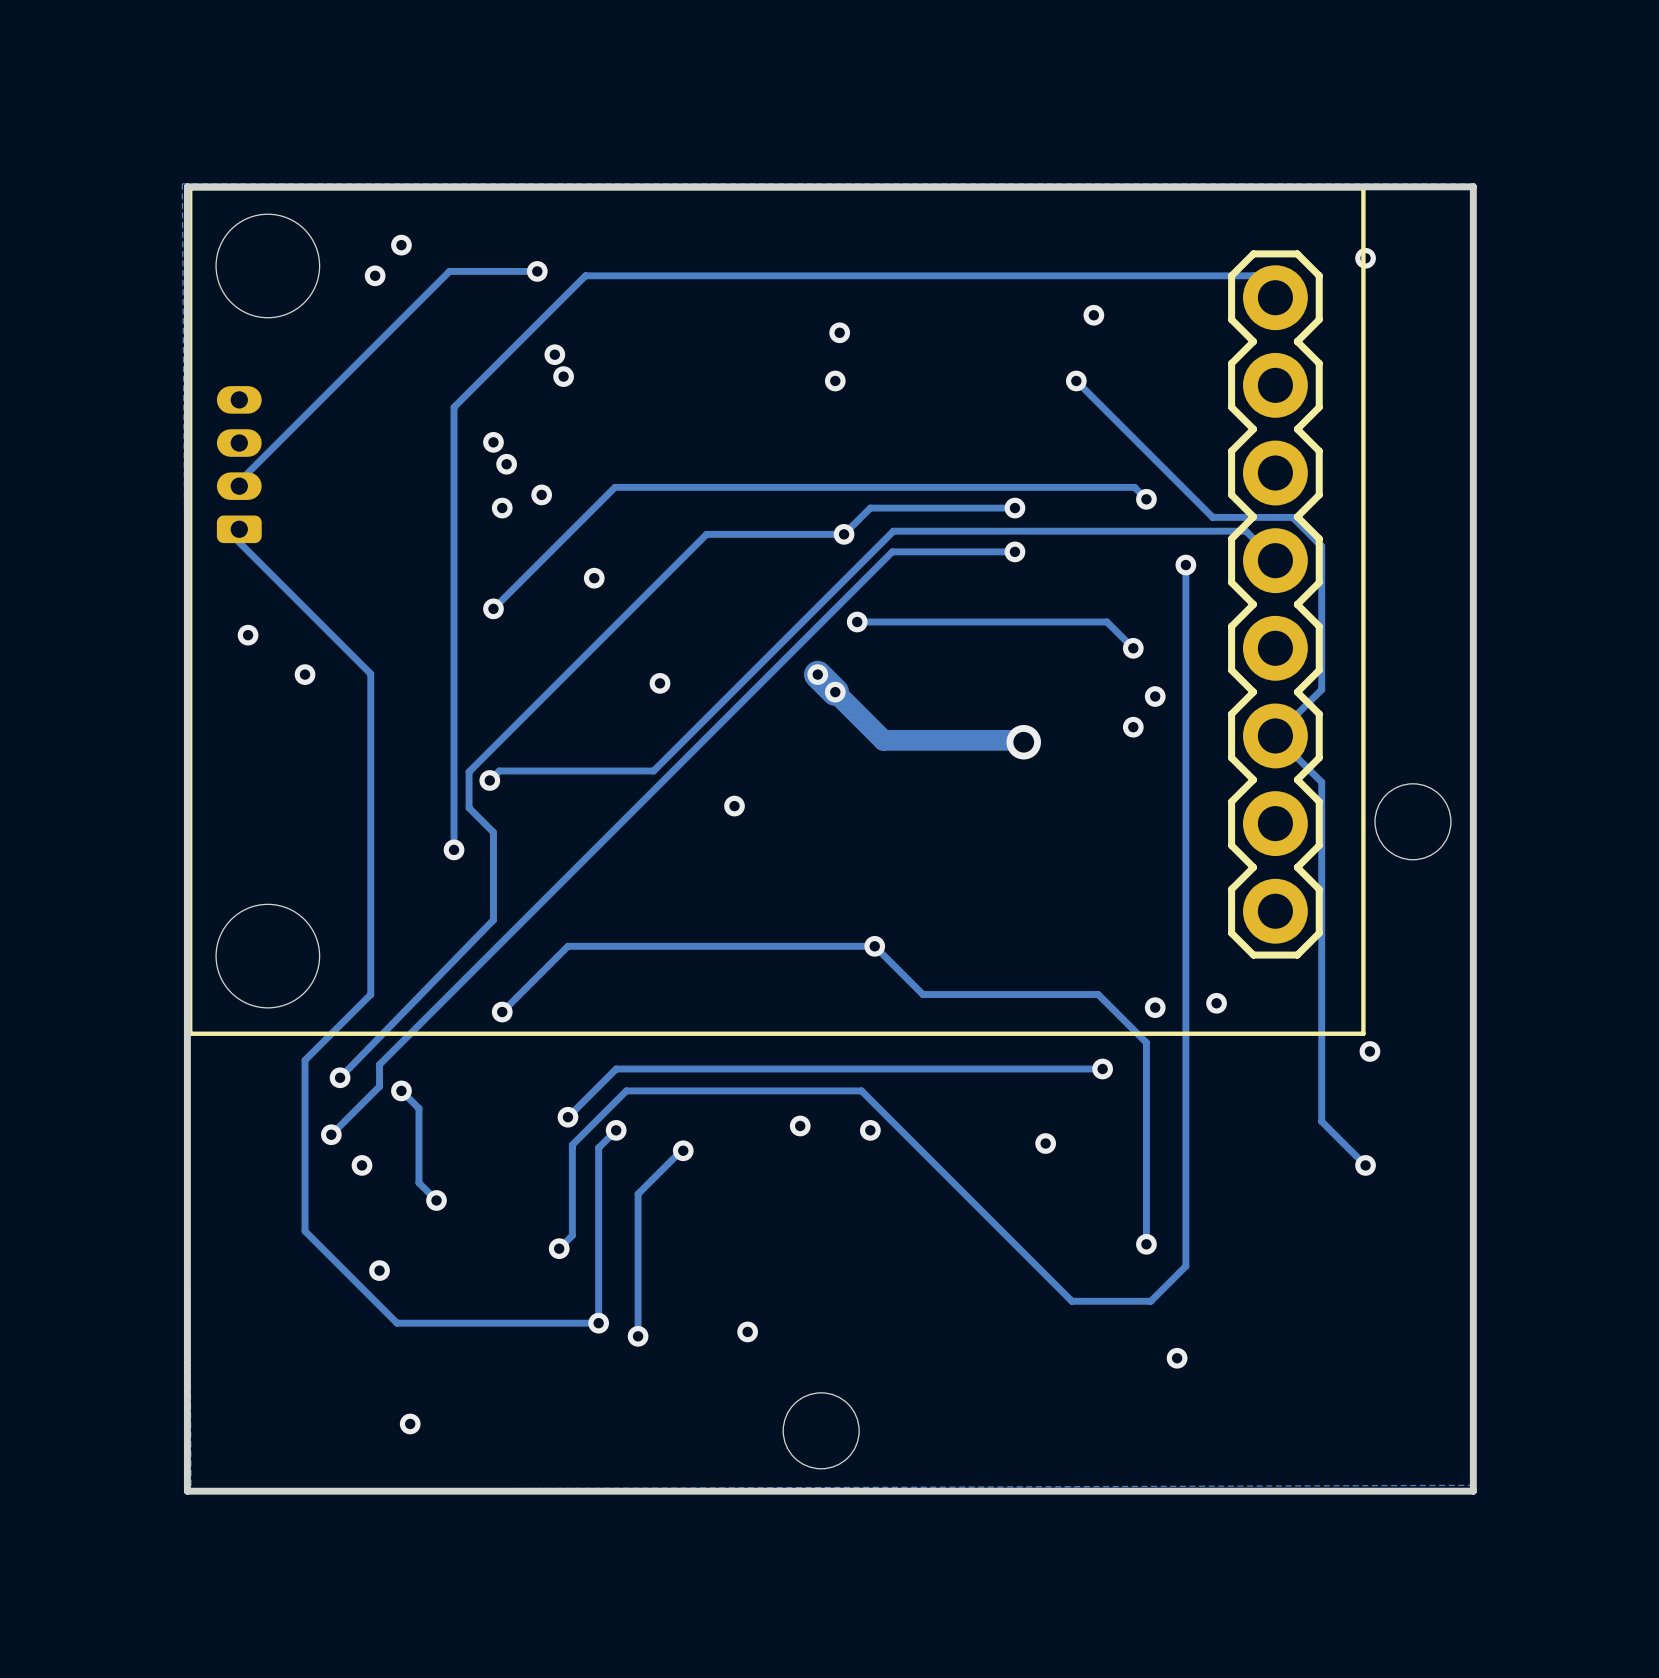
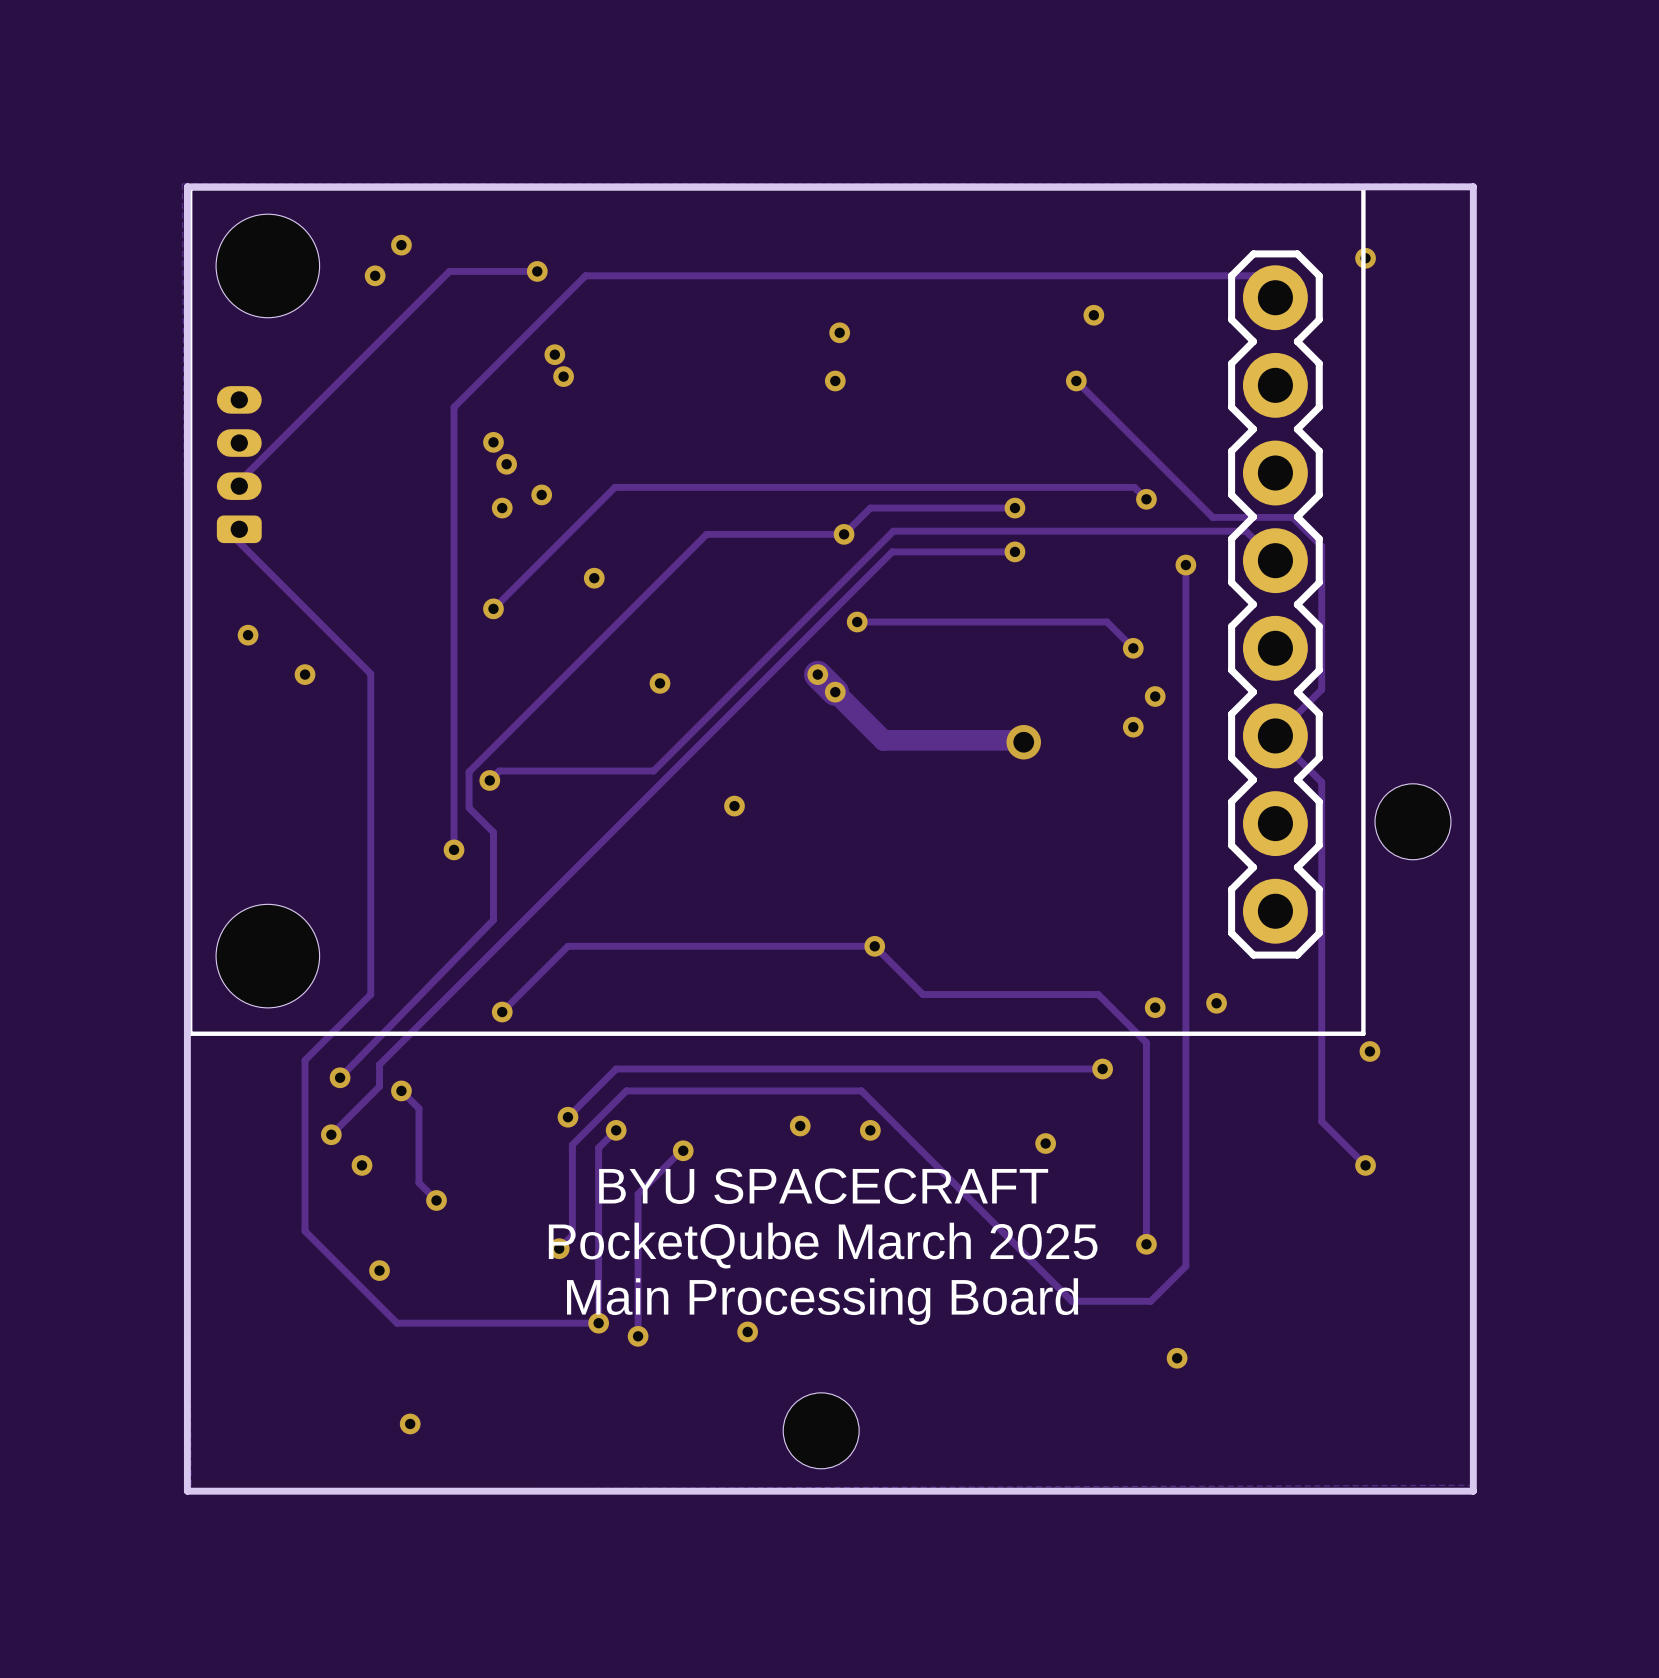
text: none -> BYU SPACECRAFT (823, 1186)
text: none -> PocketQube March 2025 (823, 1245)
text: none -> Main Processing Board (822, 1301)

